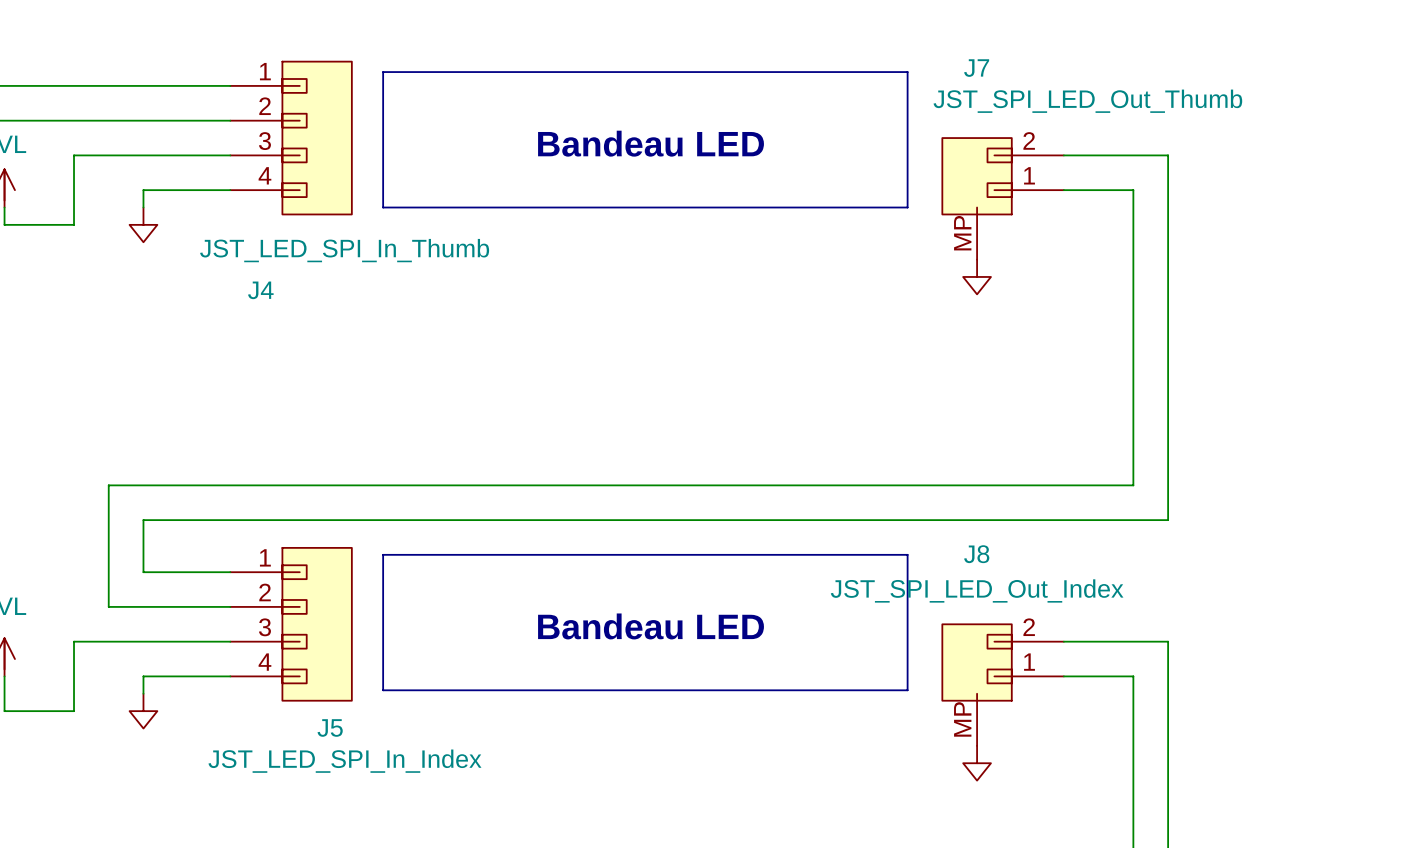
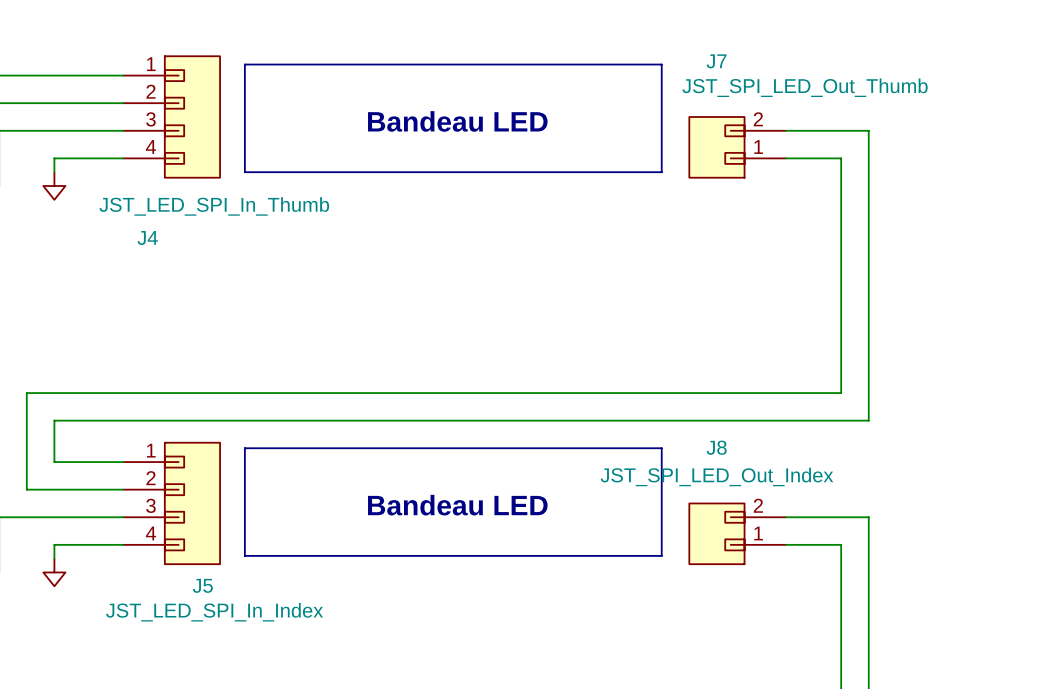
J7 symbol: [942, 138, 1064, 260] -> [689, 116, 786, 178]
power symbol: (977, 276) -> none
J8 symbol: [942, 624, 1064, 746] -> [689, 503, 786, 565]
power symbol: (977, 763) -> none

